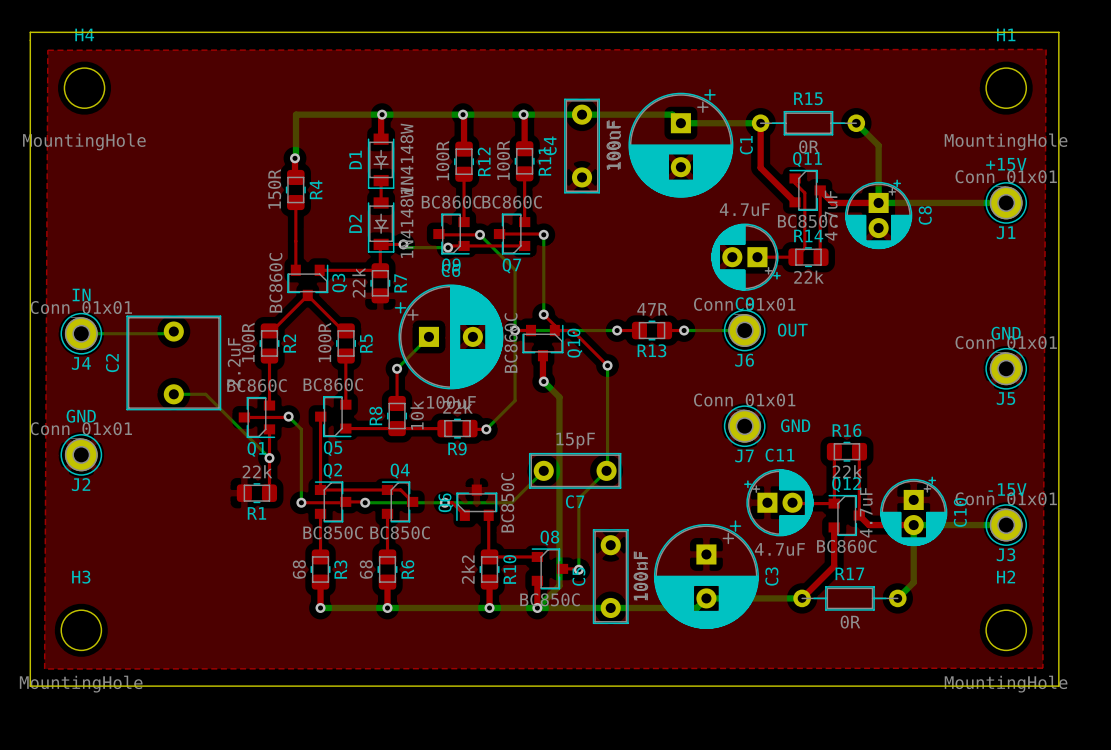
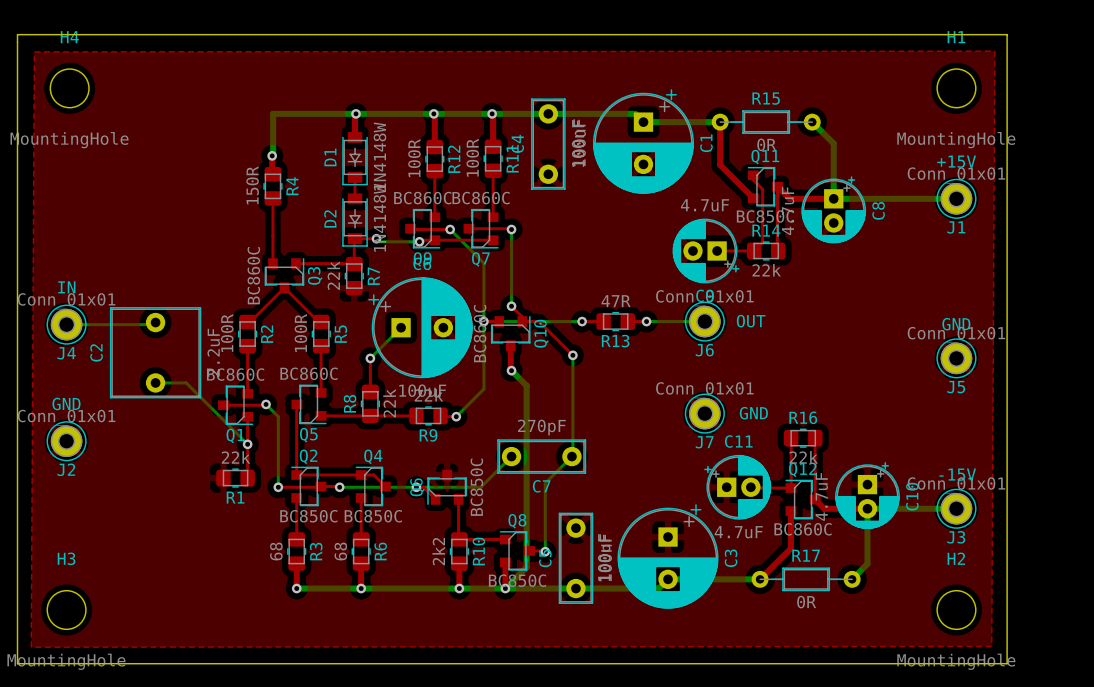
R8 value: 10k (417, 415) -> 22k (389, 403)
C7 value: 15pF (575, 440) -> 270pF (541, 427)

